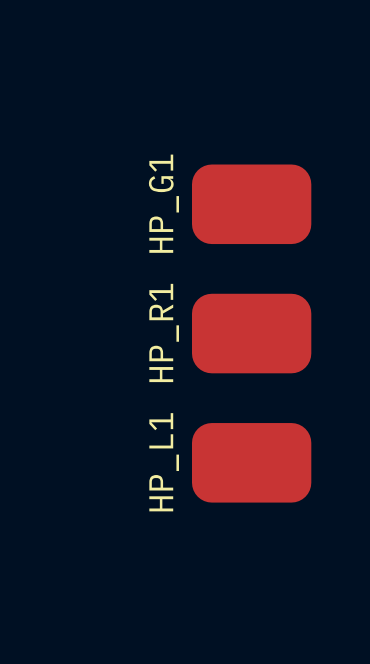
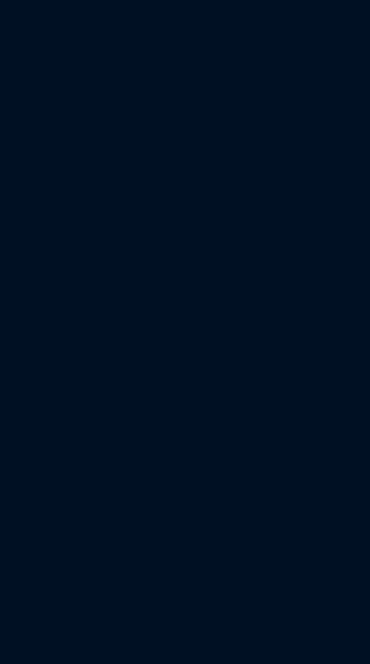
HP_G1: (251, 204) -> none
HP_R1: (251, 333) -> none
HP_L1: (251, 462) -> none

